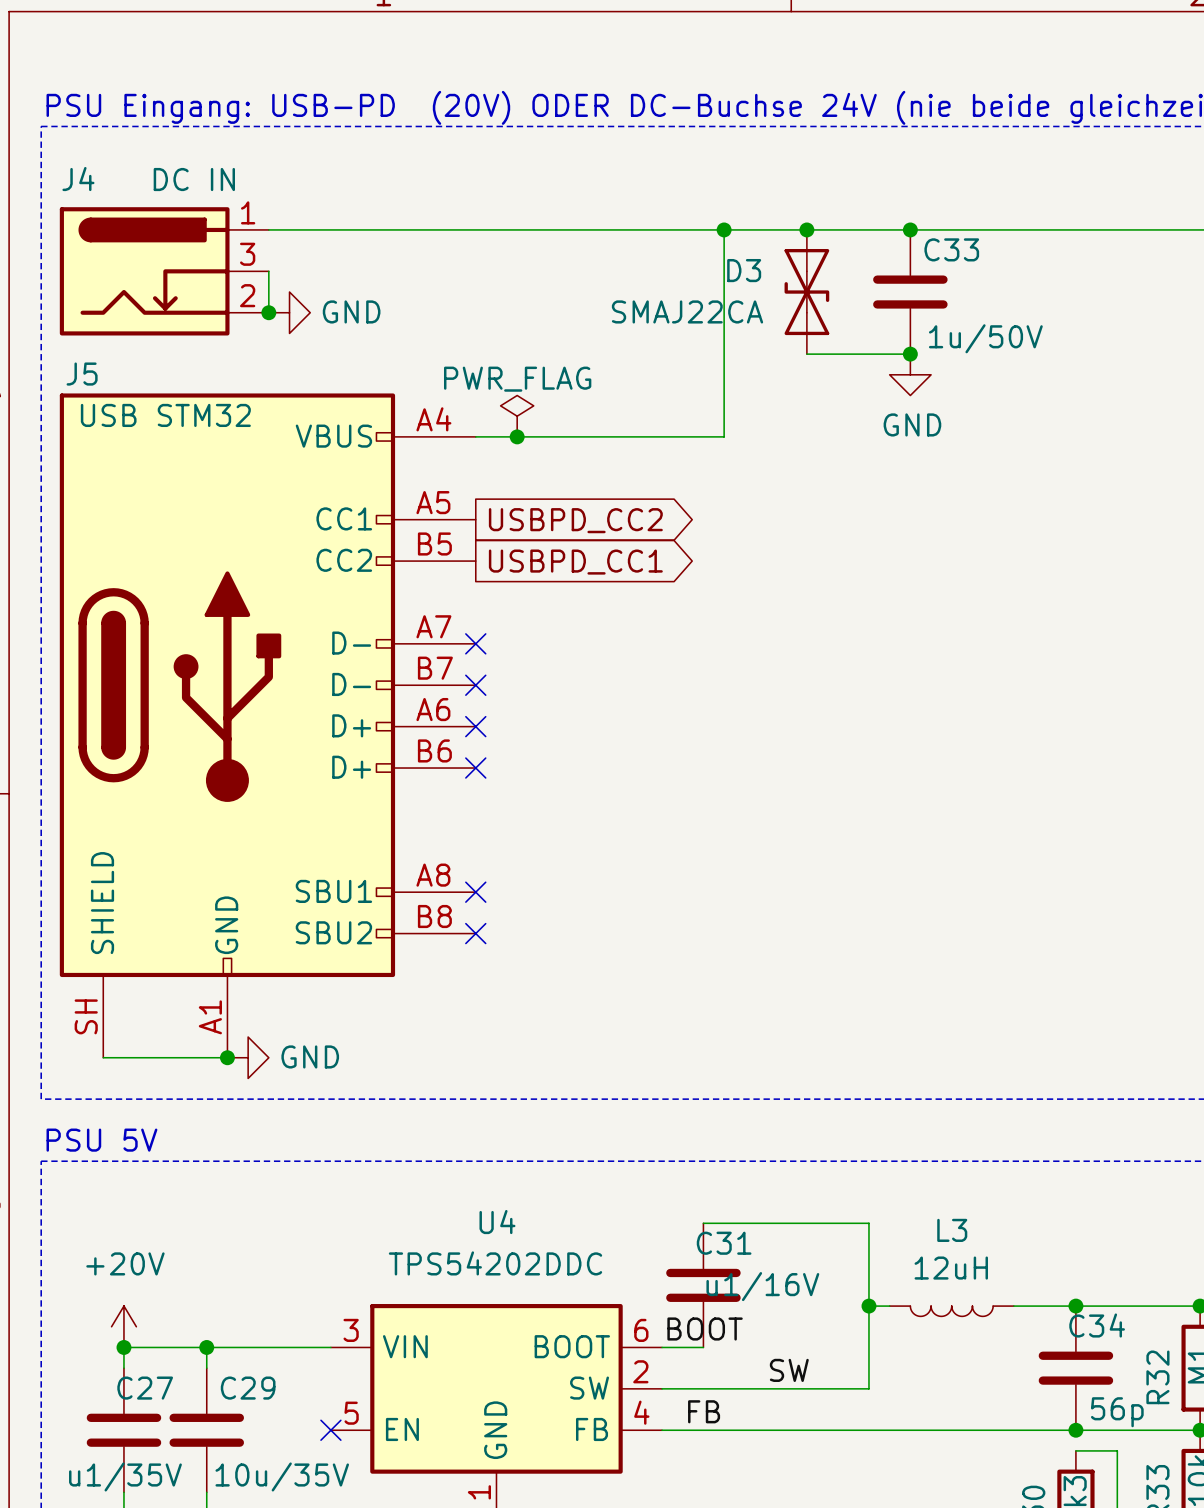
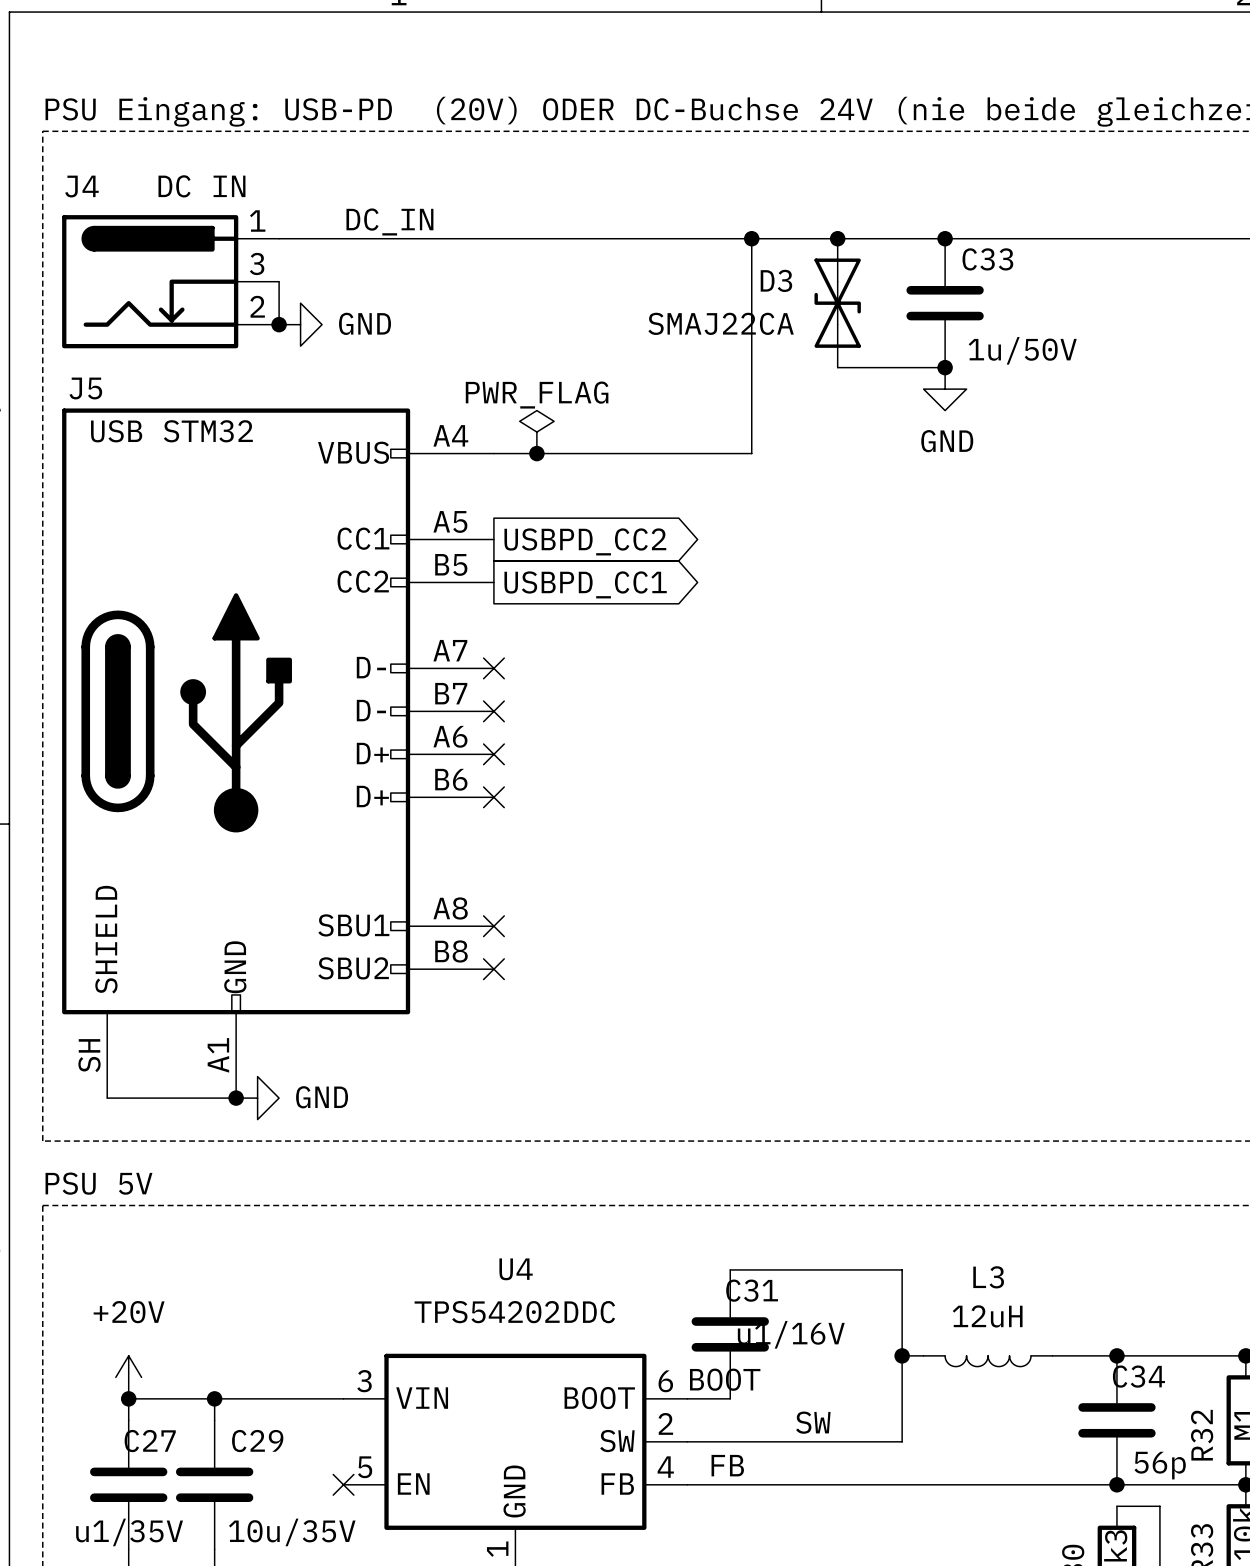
label: none -> DC_IN (389, 221)

